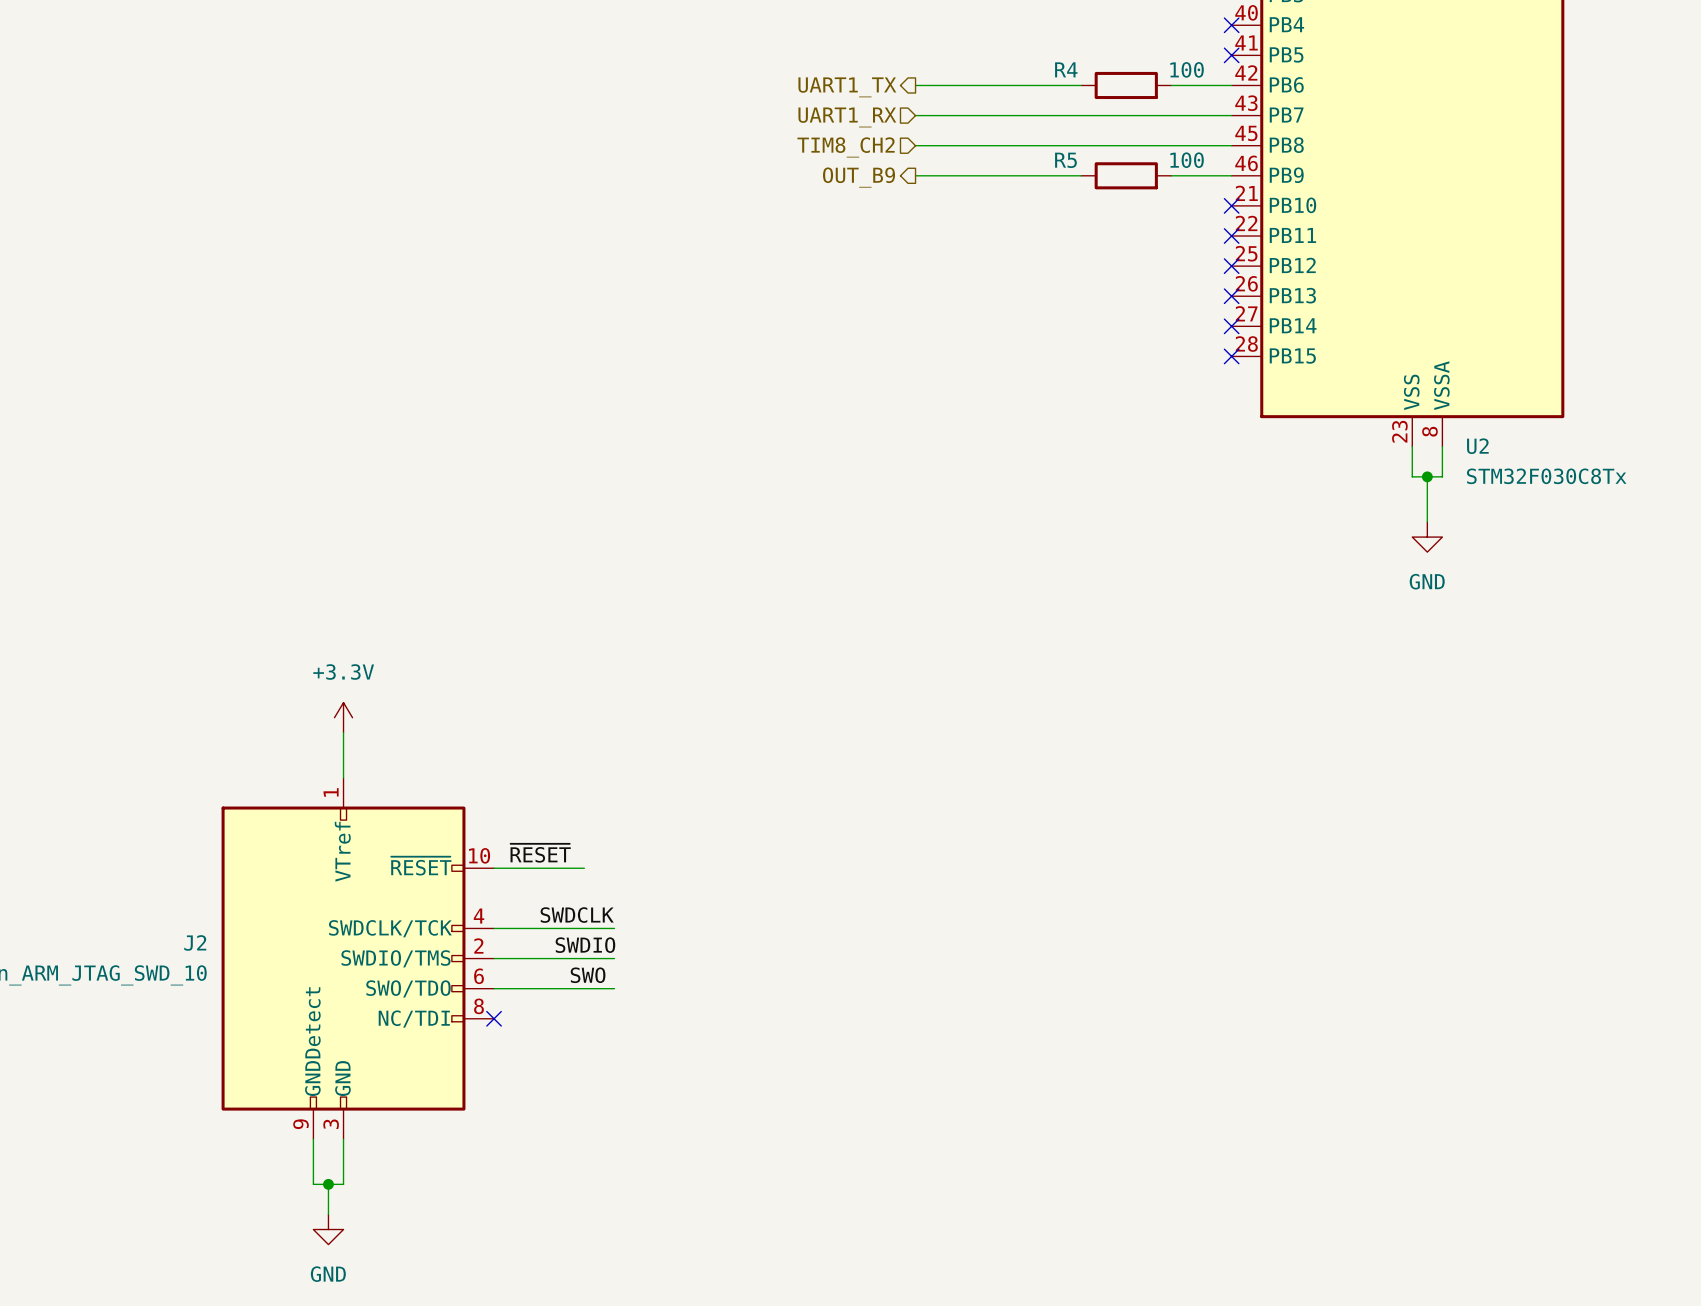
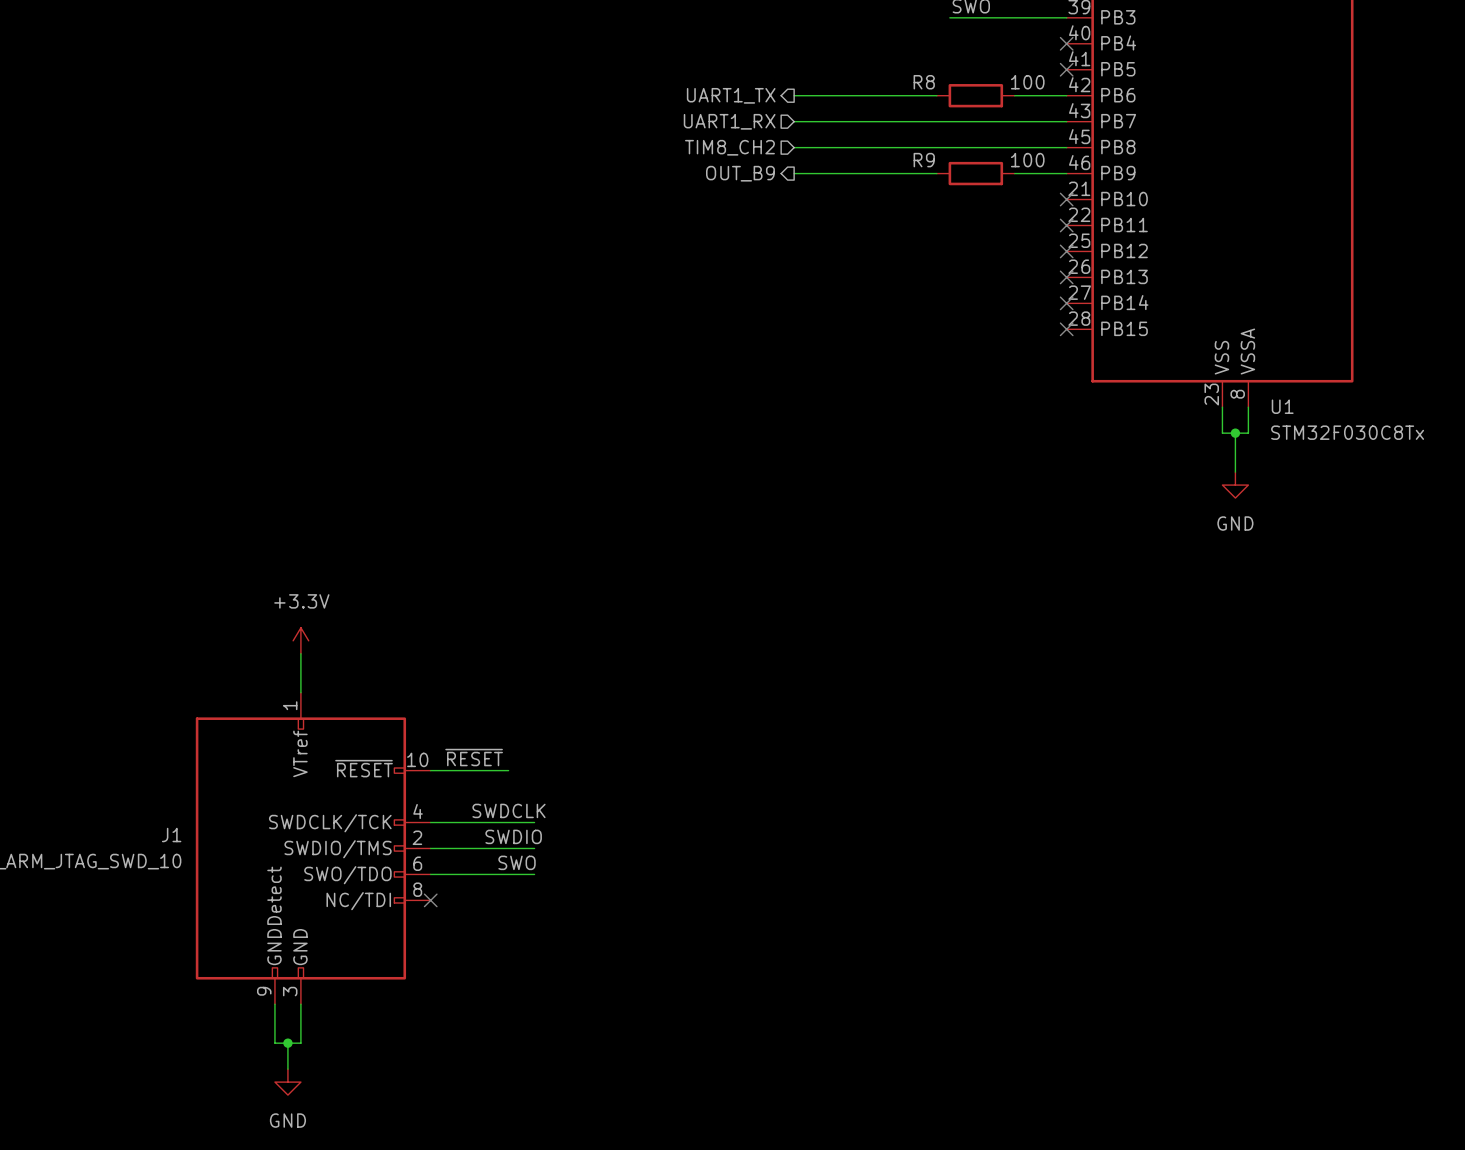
R4 name: R4 (1066, 69) -> R8 (924, 82)
R5 name: R5 (1065, 160) -> R9 (924, 160)
U2 name: U2 (1477, 446) -> U1 (1282, 406)
J2 name: J2 (195, 942) -> J1 (171, 835)

